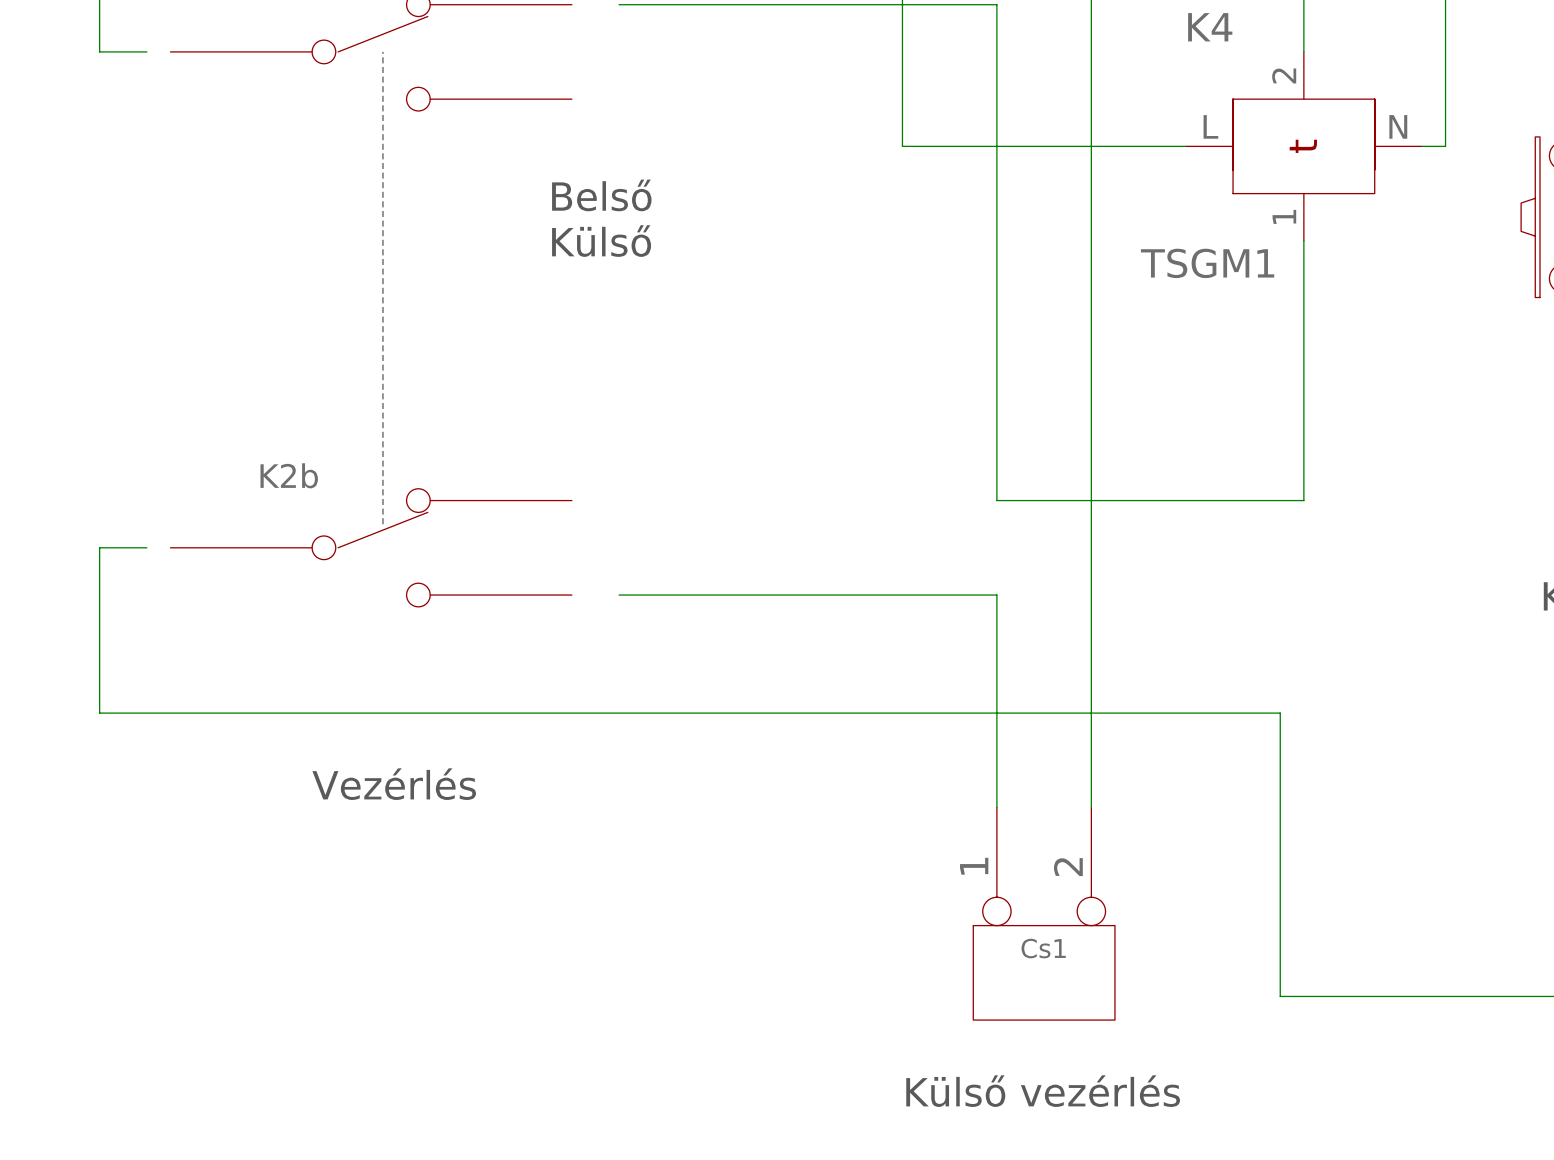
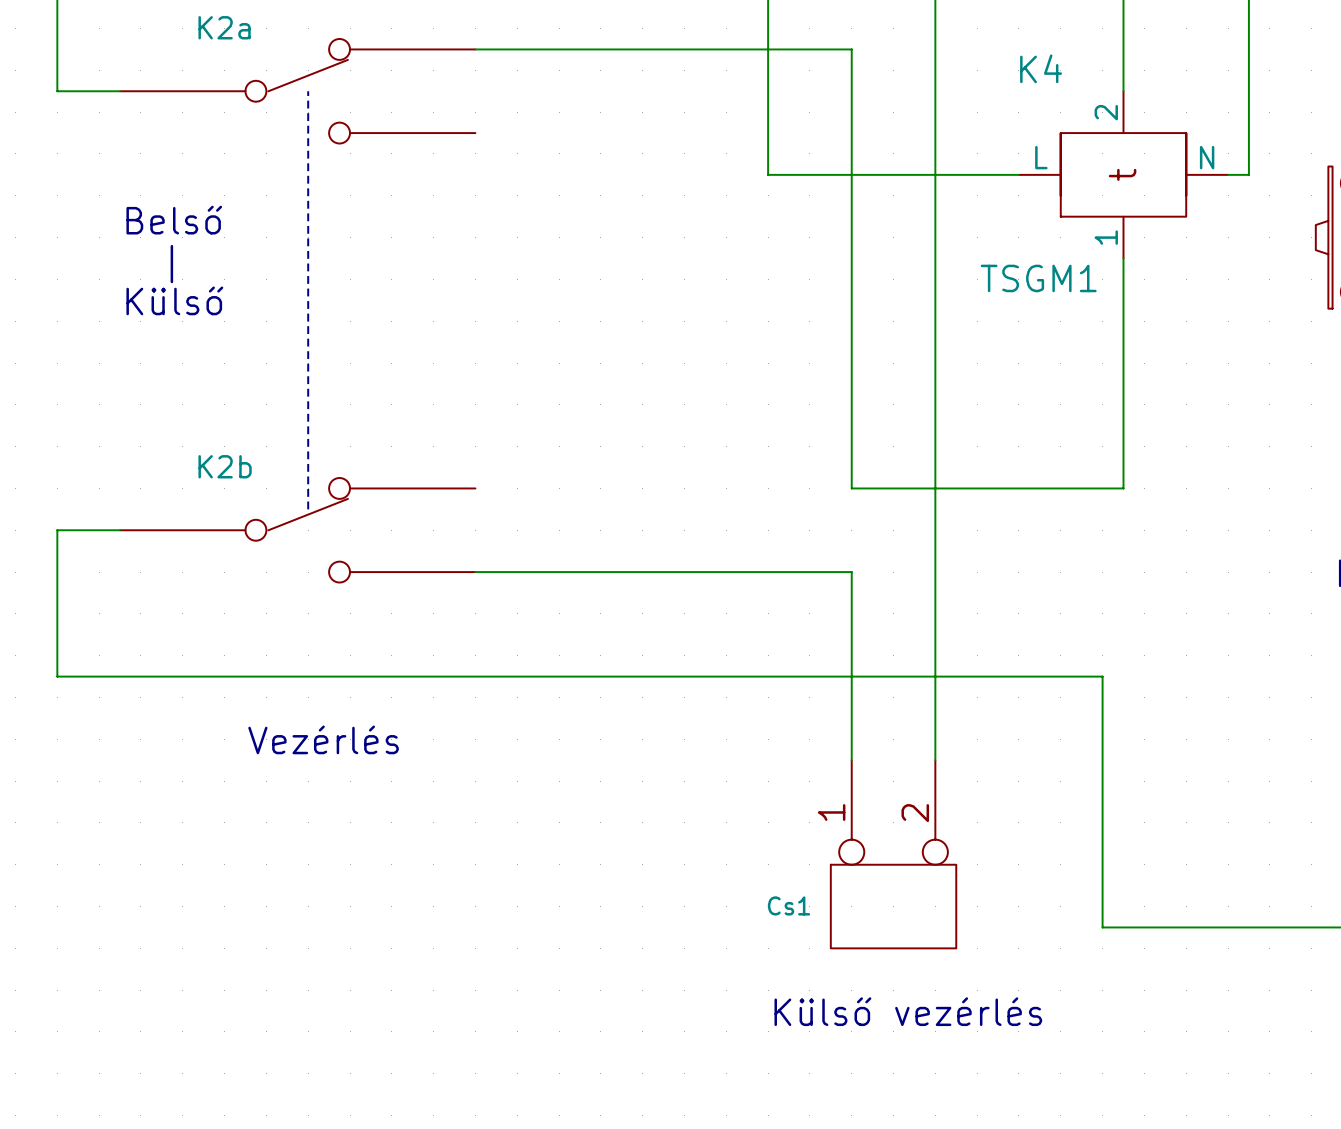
wire: none -> (475, 49) (517, 49)
wire: none -> (99, 91) (120, 91)
text position: Belső (601, 195) -> Belső (174, 220)
text position: Külső (601, 241) -> Külső (174, 300)
text: none -> | (171, 264)
wire: none -> (99, 530) (120, 530)
wire: none -> (475, 572) (517, 572)
Cs1 name position: Cs1 (1043, 948) -> Cs1 (789, 905)

